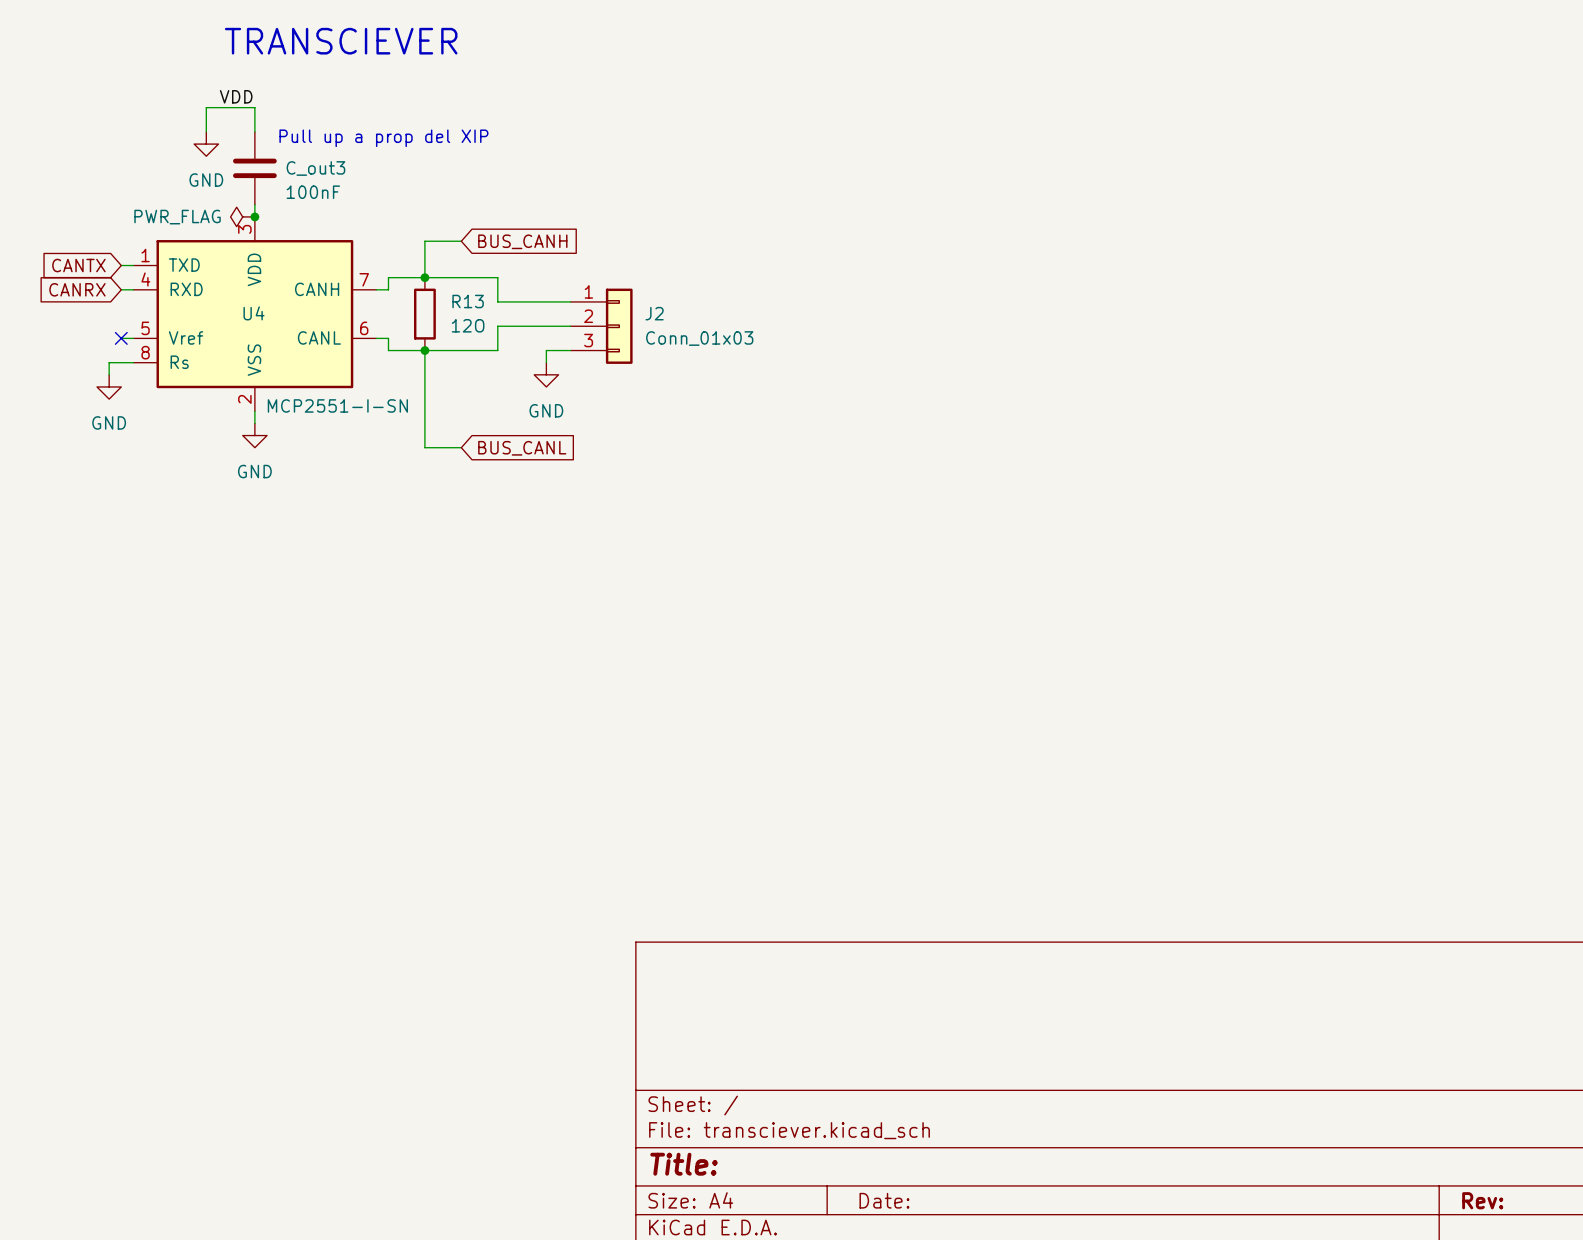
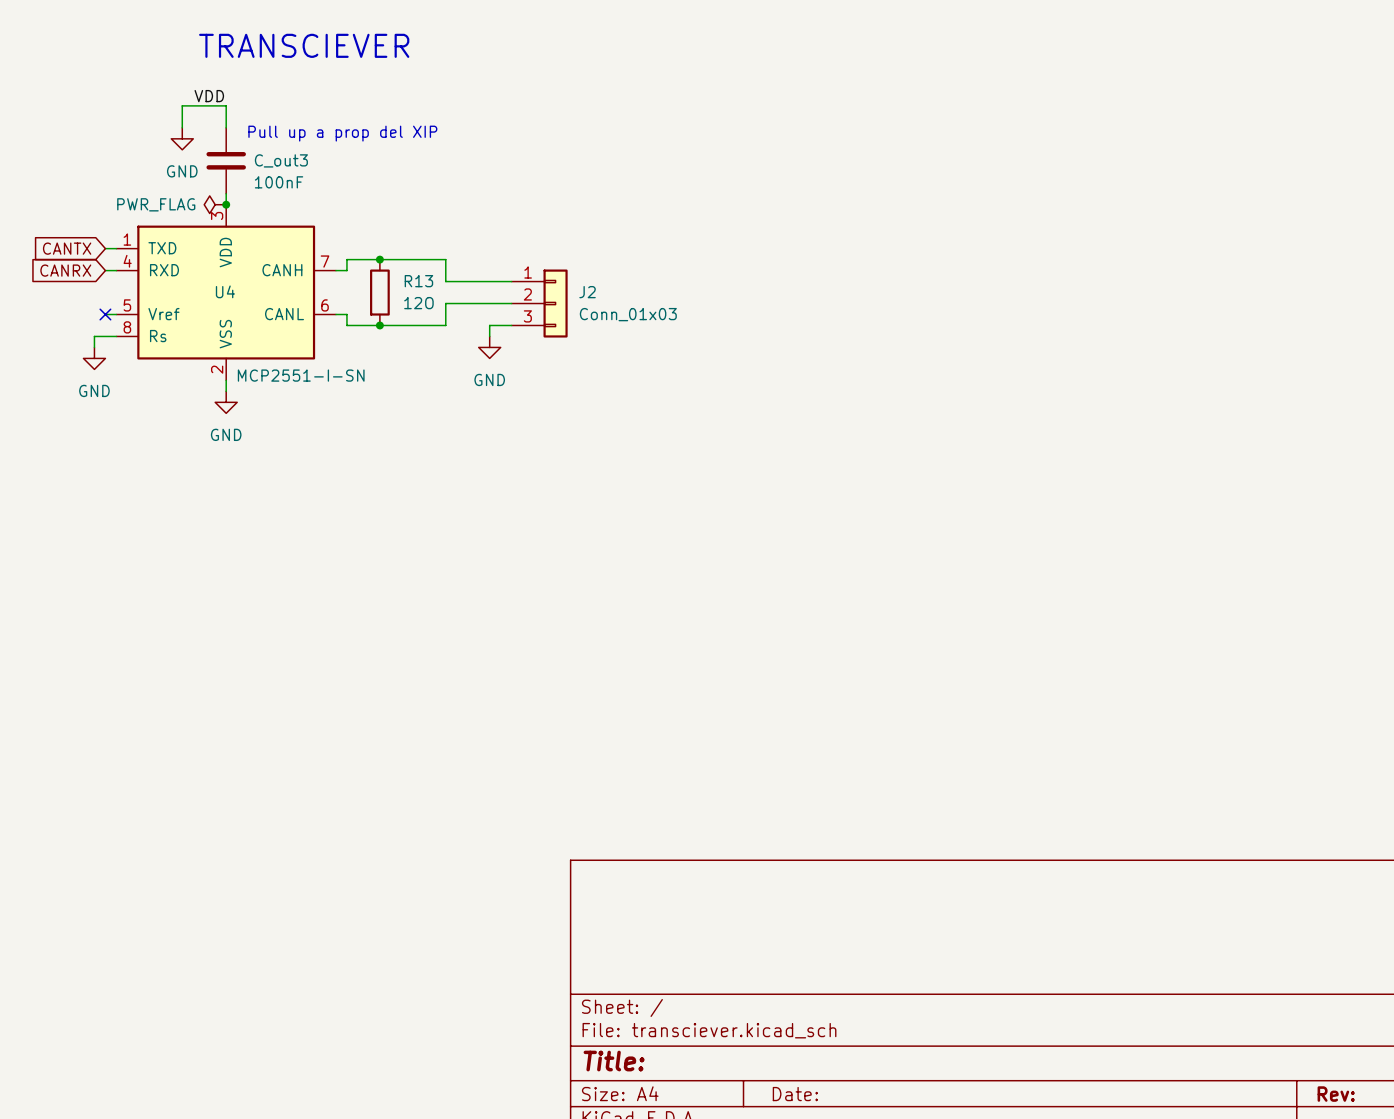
wire: (461, 241) (424, 241) (424, 277) -> none
global label: BUS_CANH (522, 241) -> none
wire: (424, 350) (424, 447) (461, 447) -> none
global label: BUS_CANL (522, 448) -> none

